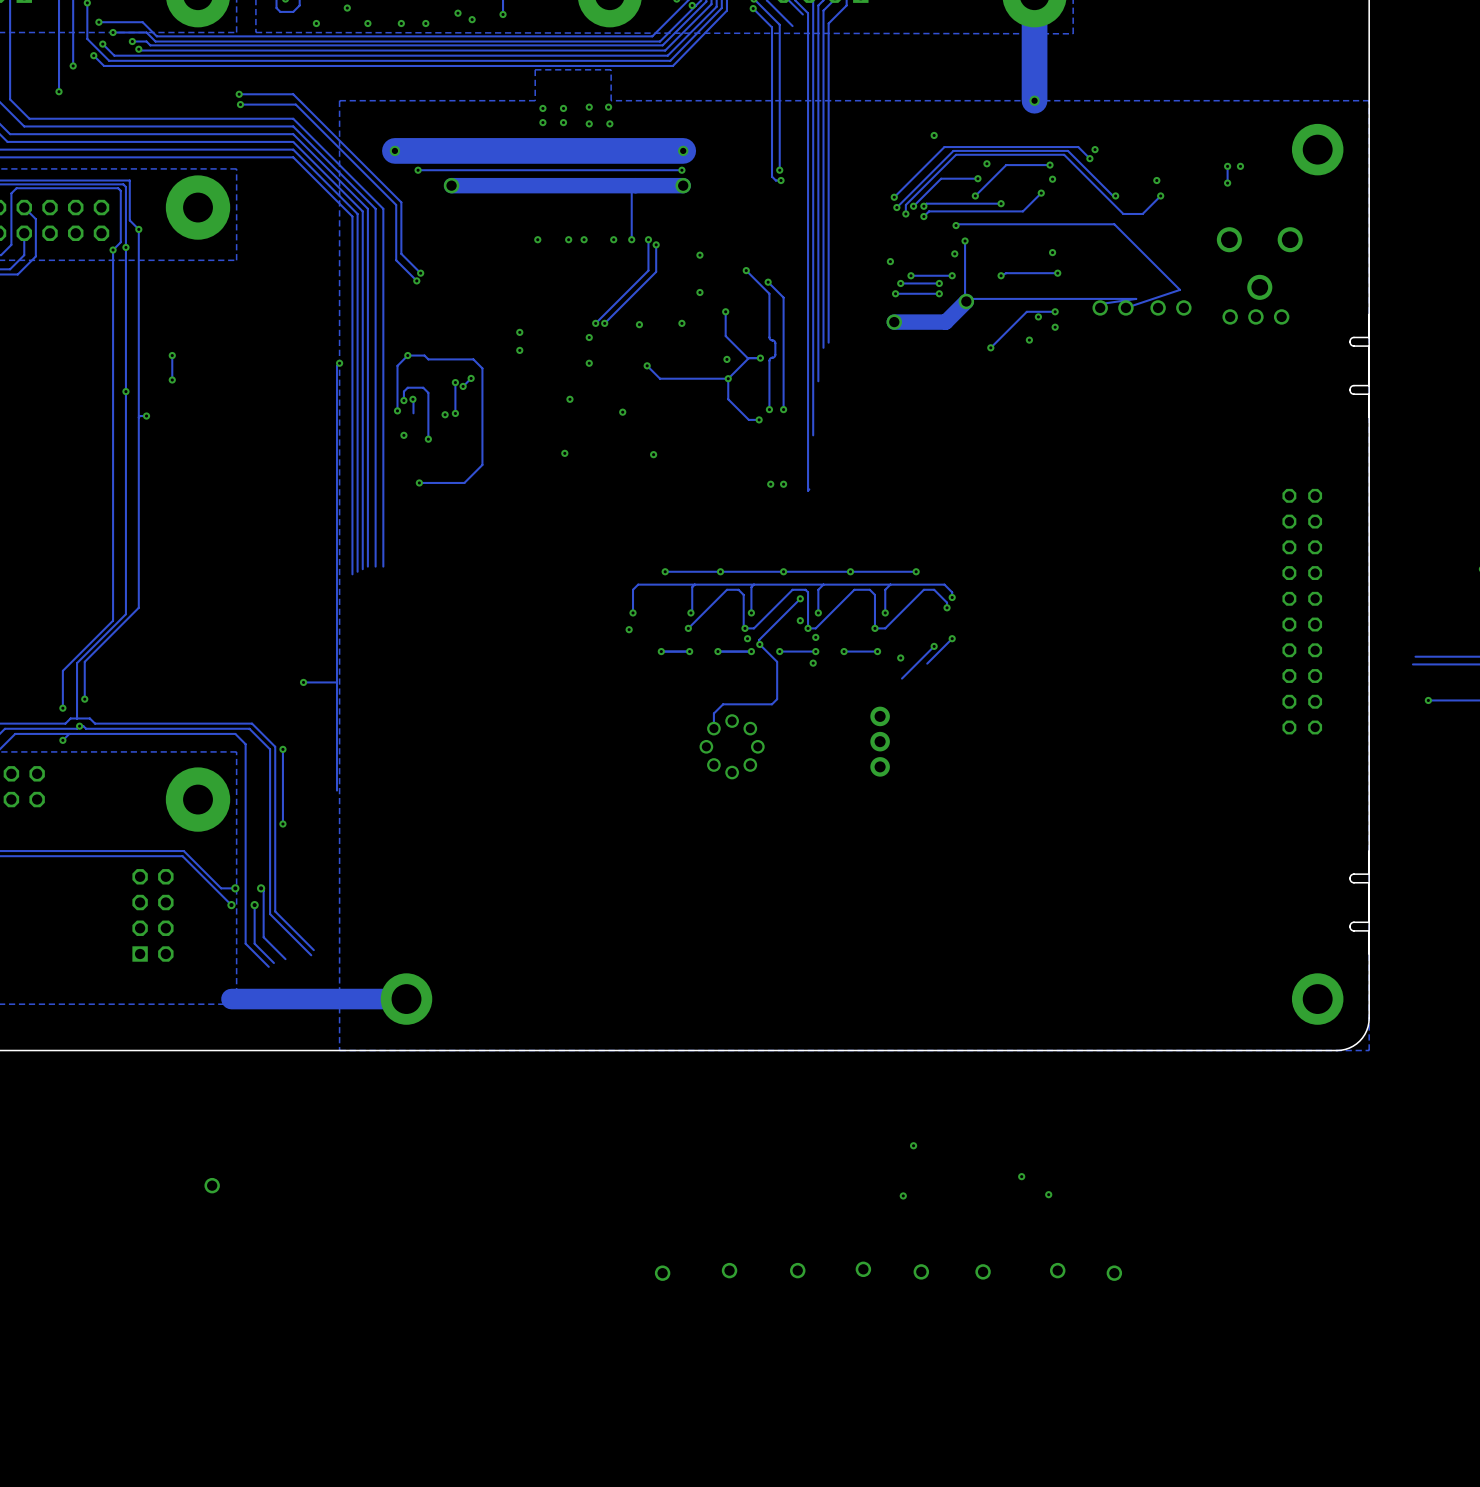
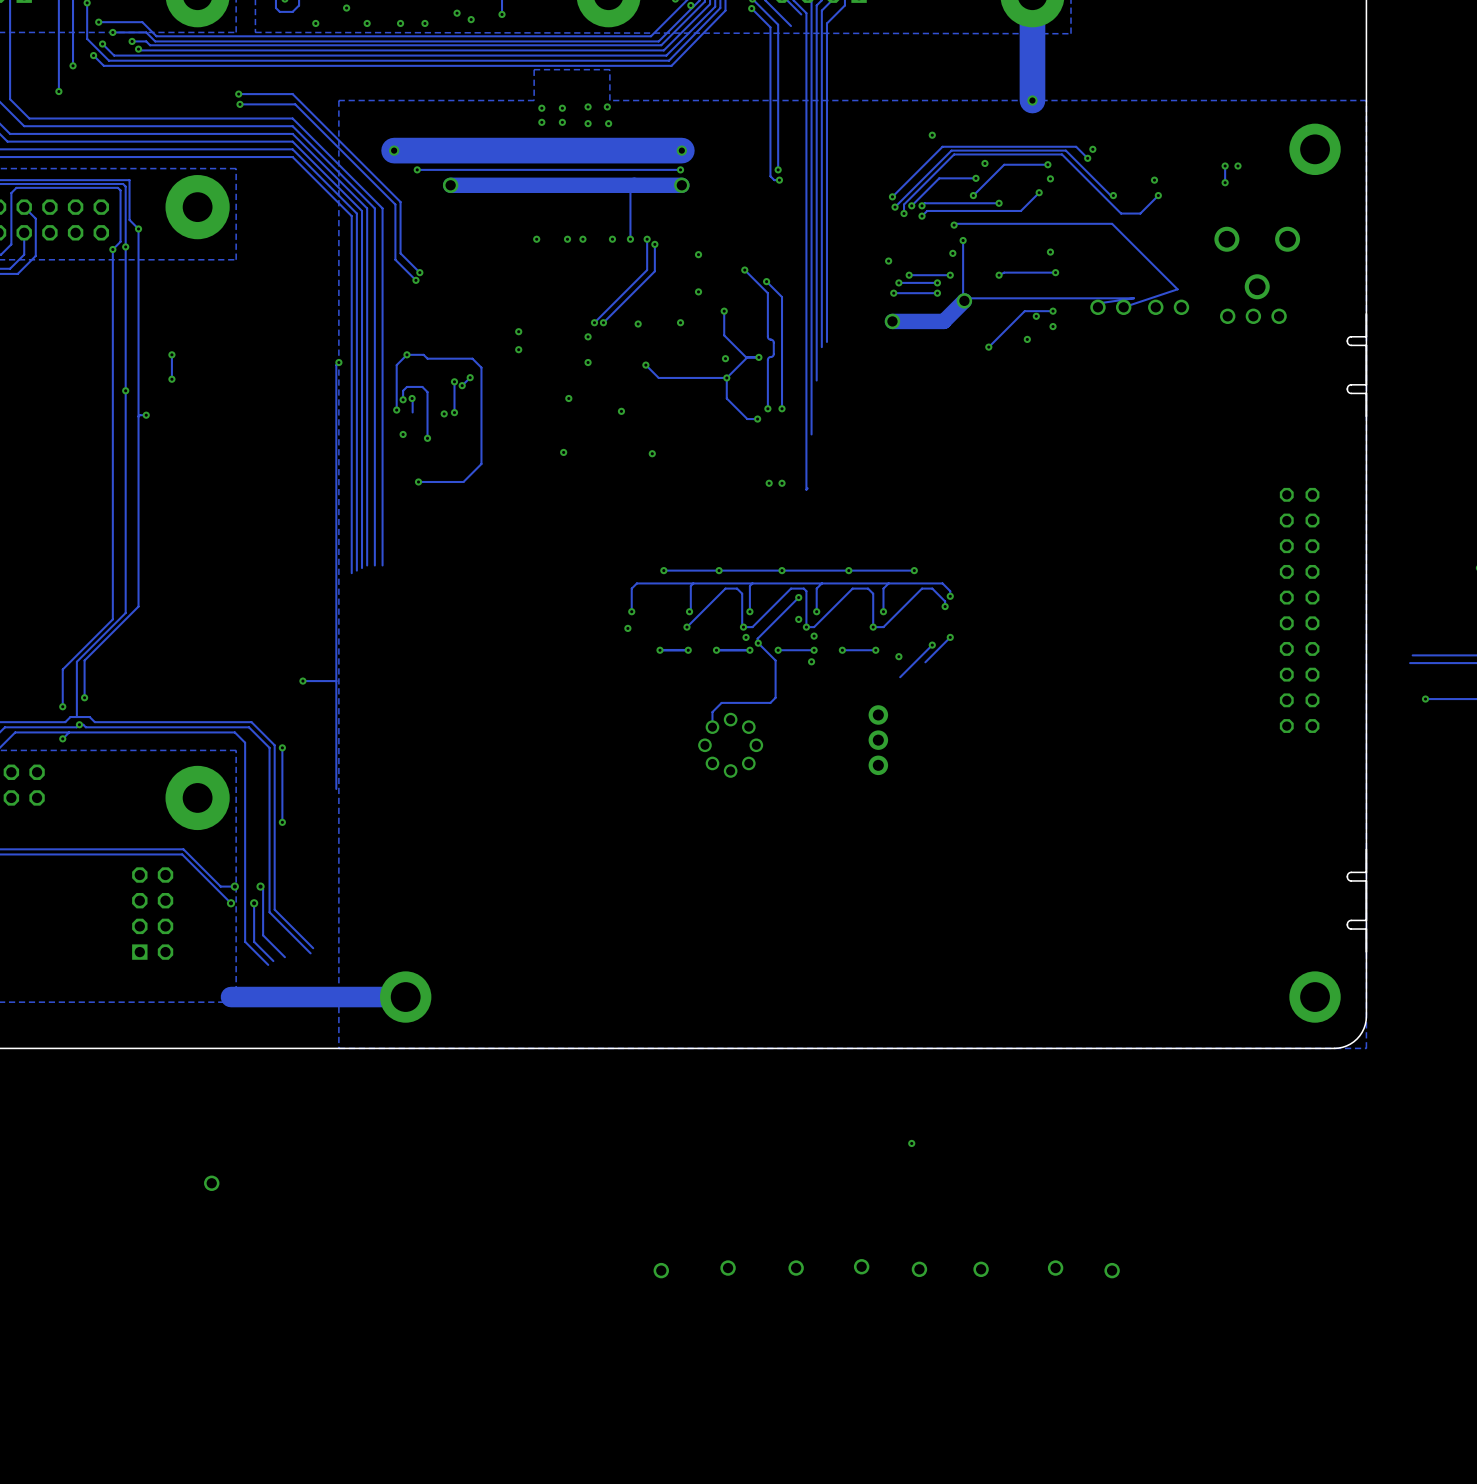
via: (1021, 1176) -> none
via: (1048, 1194) -> none
via: (903, 1195) -> none

